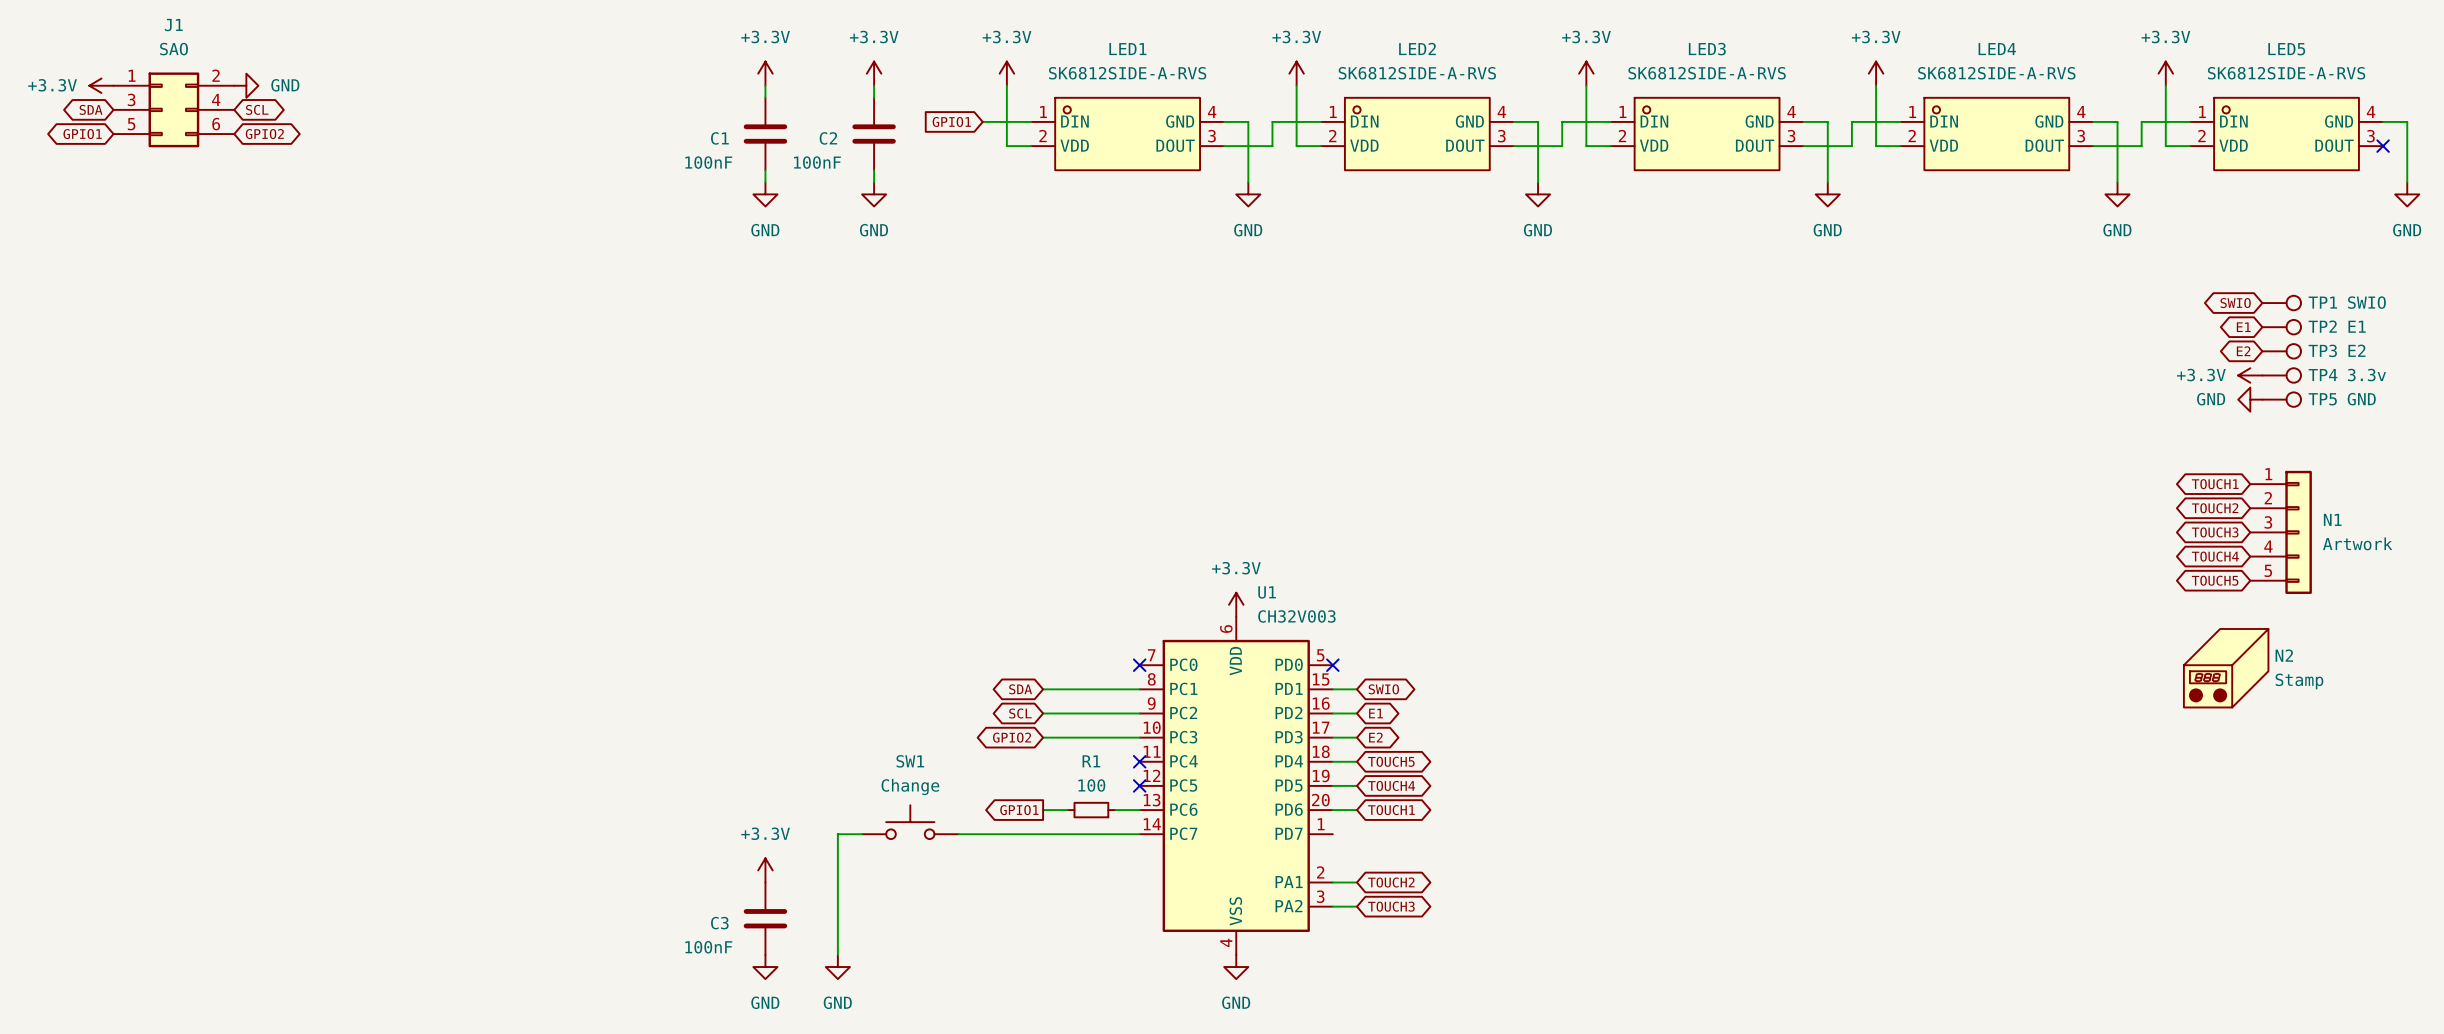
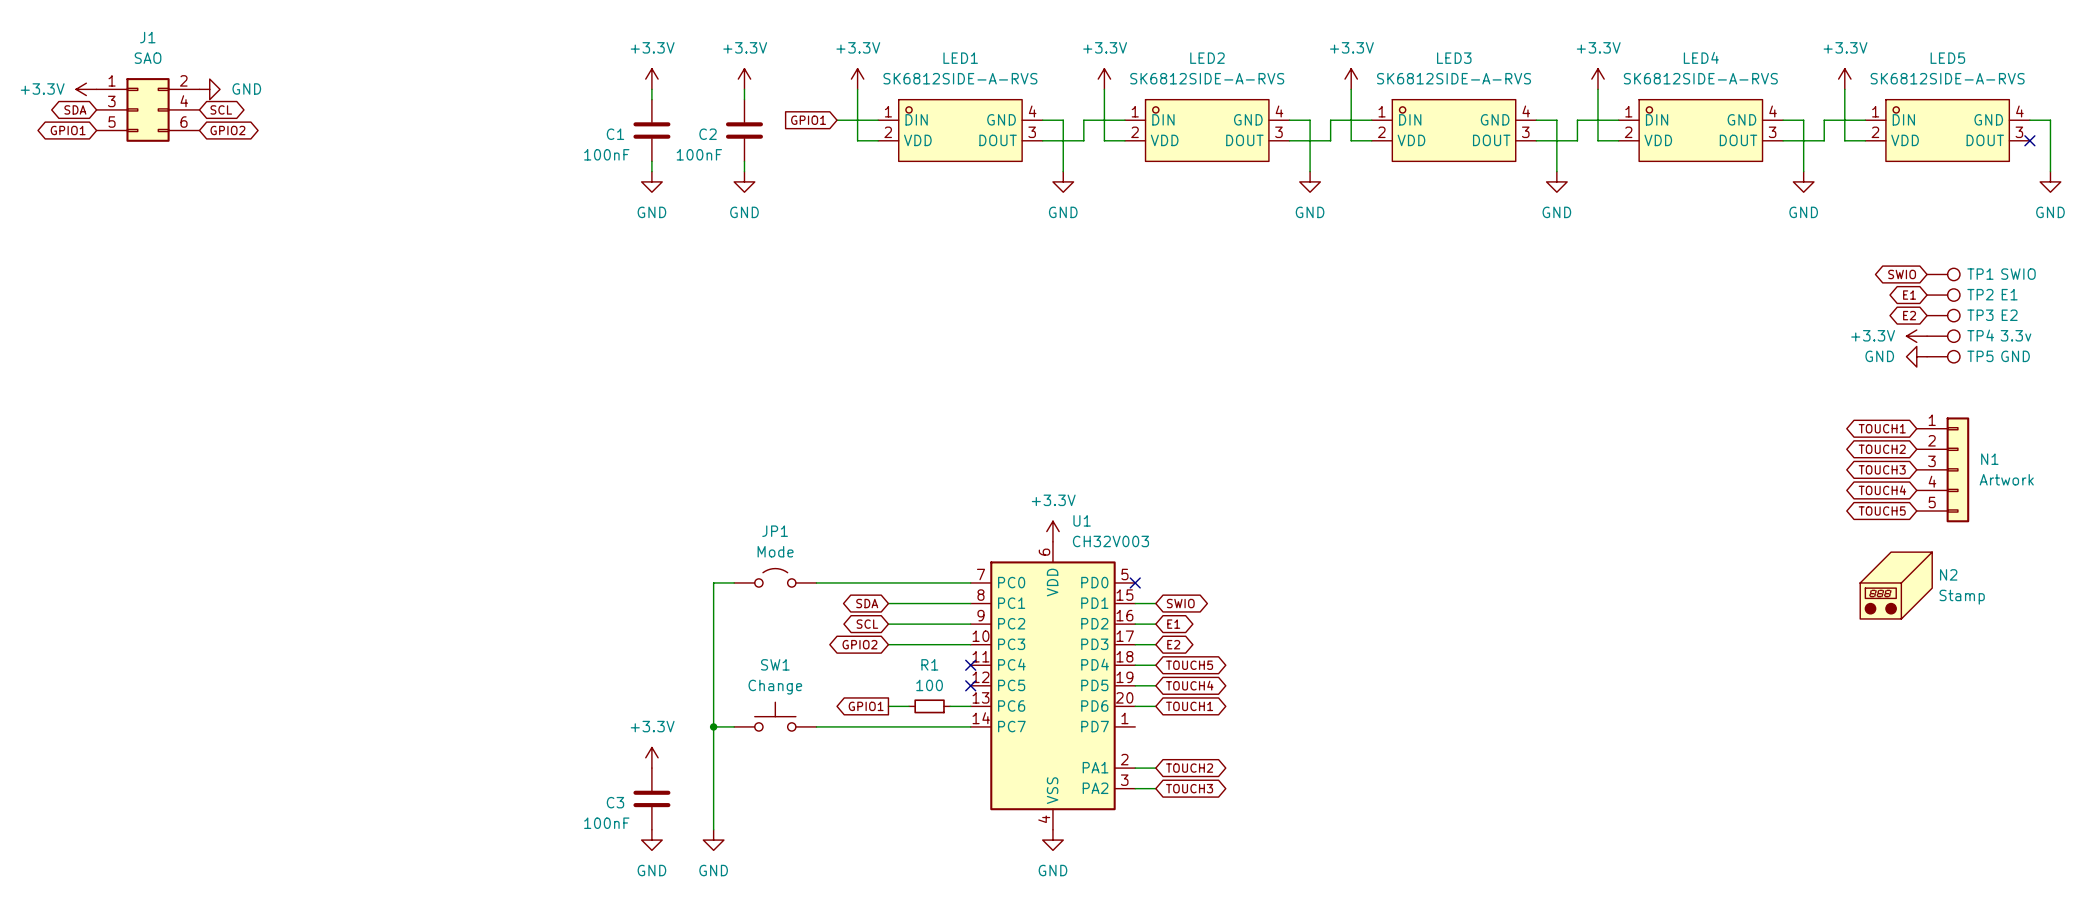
JP1: none -> Mode (775, 577)
wire: none -> (734, 582) (713, 582) (713, 726)
wire: none -> (816, 582) (970, 582)
no-connect mark: (1139, 665) -> none
junction: none -> (713, 726)

